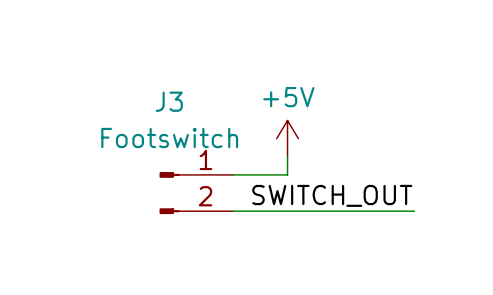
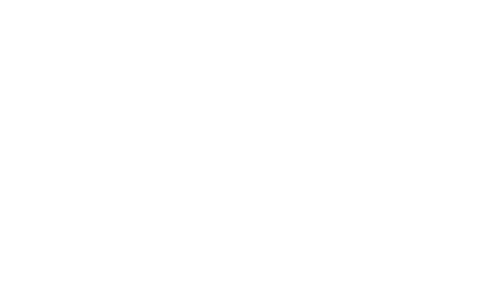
power symbol: +5V (287, 138) -> none
wire: (287, 156) (287, 174) (233, 174) -> none
J3: Footswitch (196, 193) -> none
label: SWITCH_OUT (332, 195) -> none
wire: (233, 211) (414, 211) -> none

